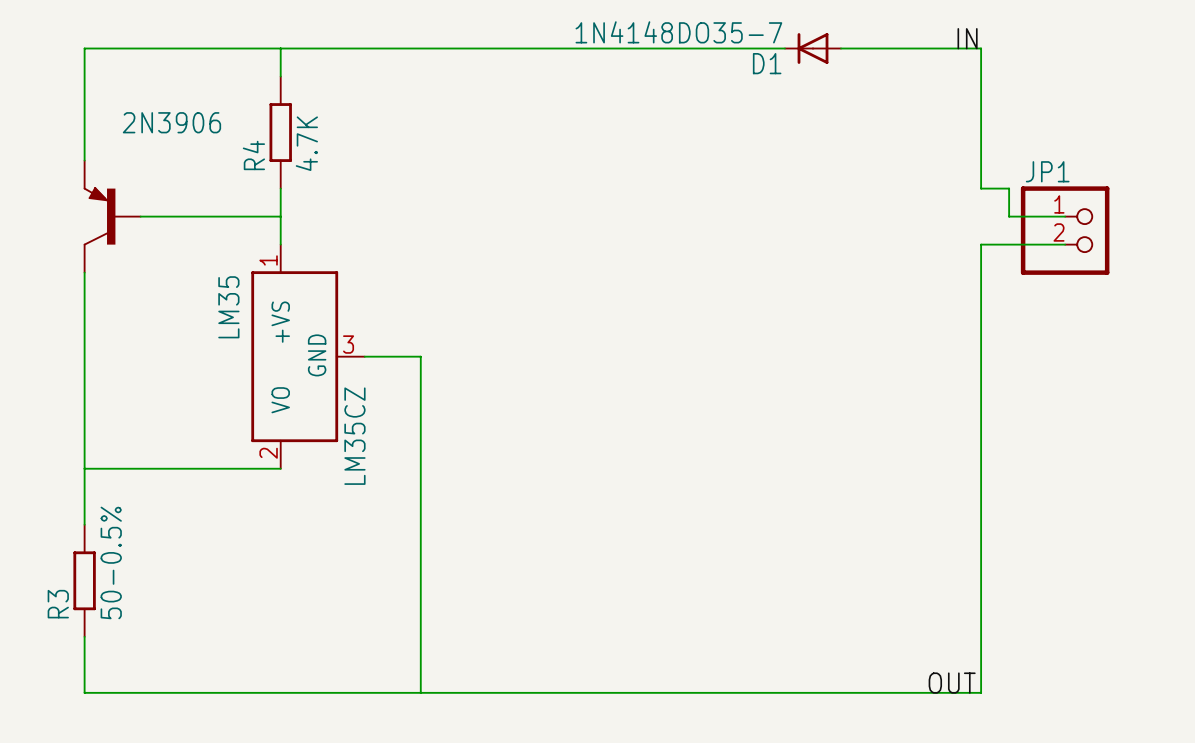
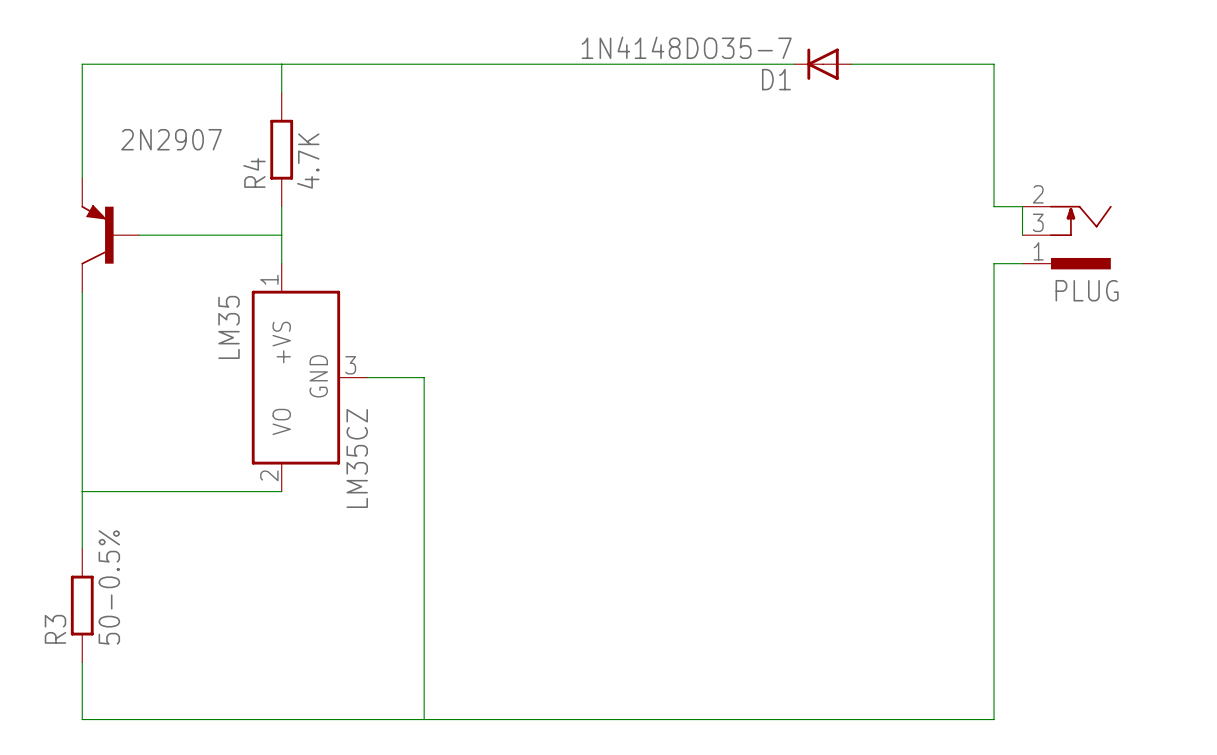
label: IN (967, 38) -> none
2N3906 name: 2N3906 (171, 122) -> 2N2907 (171, 139)
PLUG: none -> (1067, 237)
JP1: (1065, 230) -> none
label: OUT (952, 683) -> none

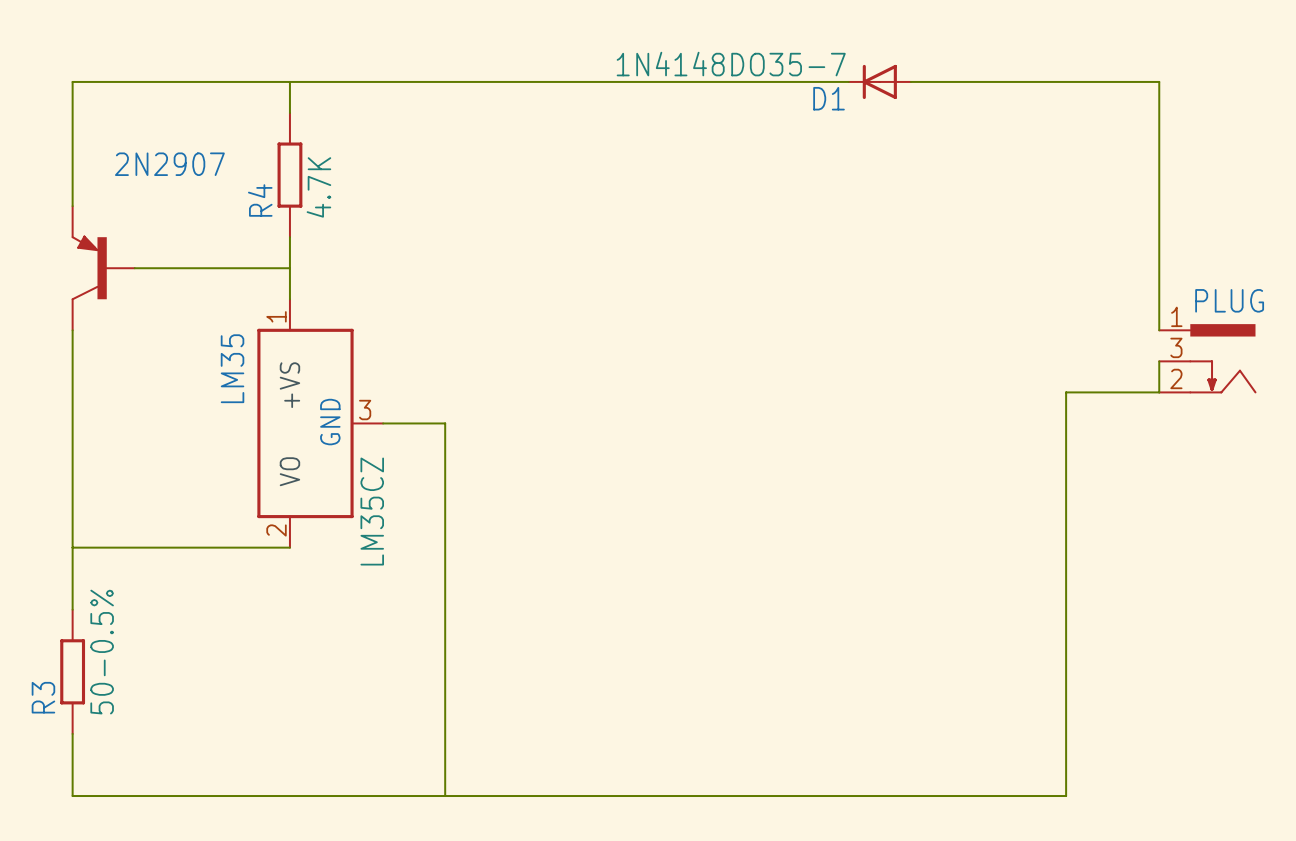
wire: (994, 64) (994, 206) (1022, 206) (1022, 235) -> (1066, 81) (1159, 81) (1159, 330)
PLUG: (1067, 237) -> none
wire: (1022, 263) (994, 263) (994, 349) -> (1159, 361) (1159, 392) (1066, 392)
PLUG: none -> (1207, 358)

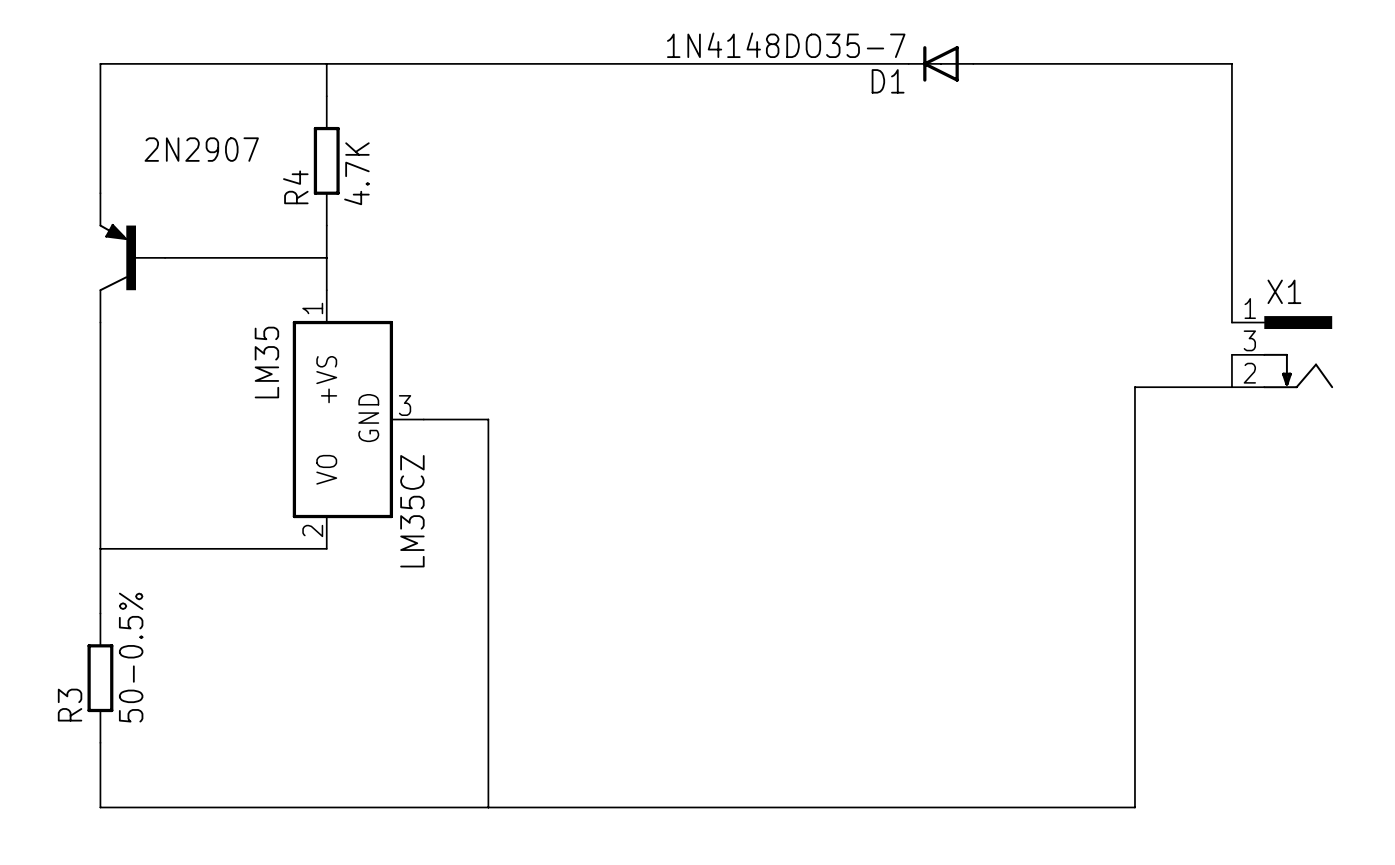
PLUG name: PLUG (1229, 300) -> X1 (1284, 291)

